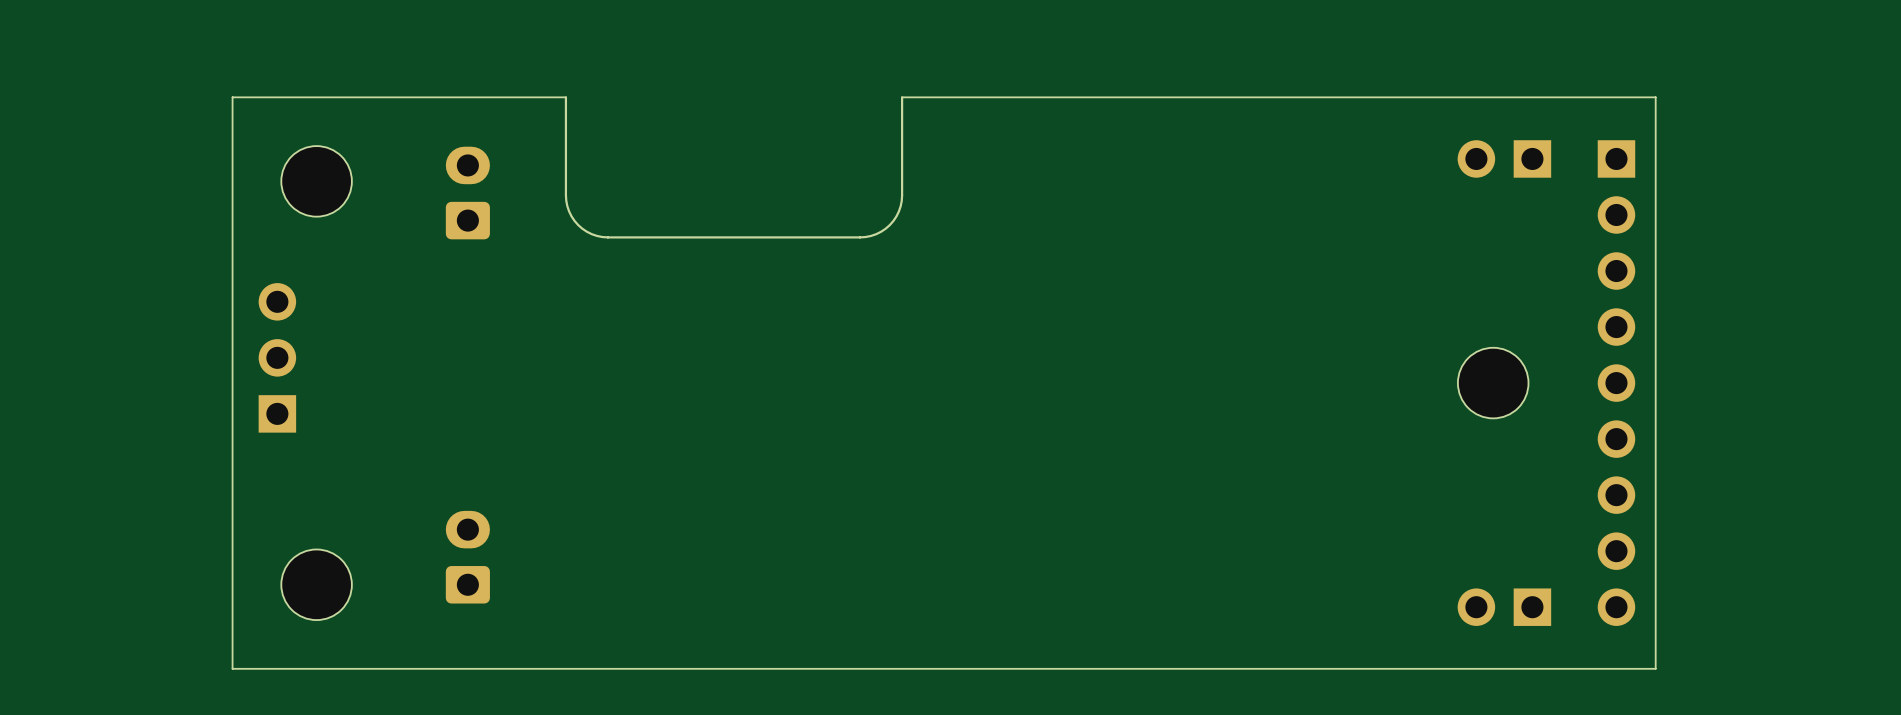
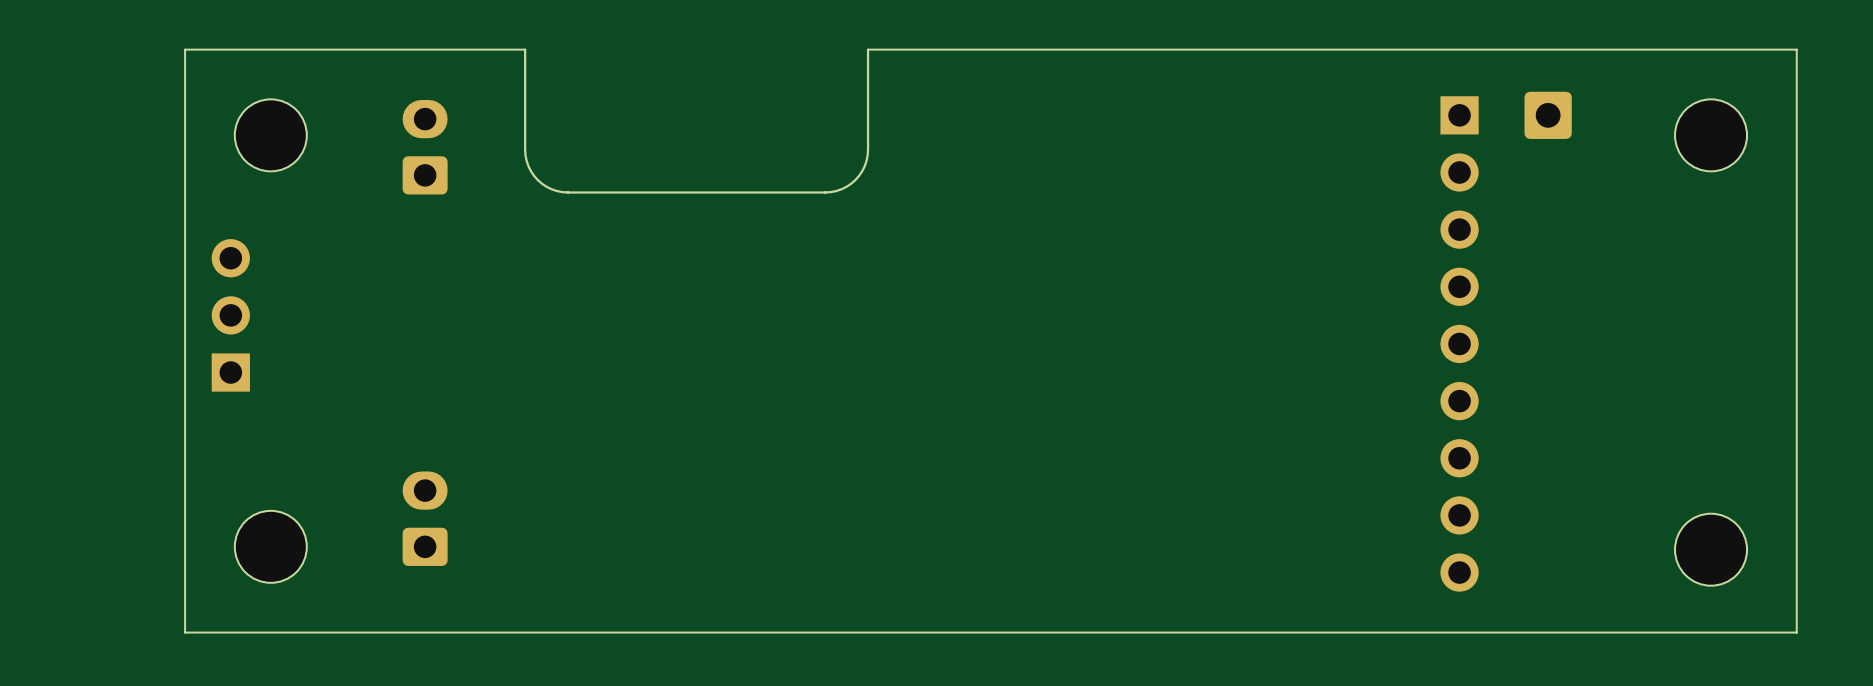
board edge: (1655, 97) (1655, 668) -> (1636, 49) (1796, 49) (1796, 632) (1636, 632)
part: (1504, 158) -> none
part: none -> (1548, 115)
part: none -> (1711, 135)
part footprint: [1457, 347, 1529, 419] -> [1440, 96, 1479, 592]
part: (1616, 383) -> none
part: none -> (1711, 549)
part: (1504, 607) -> none

